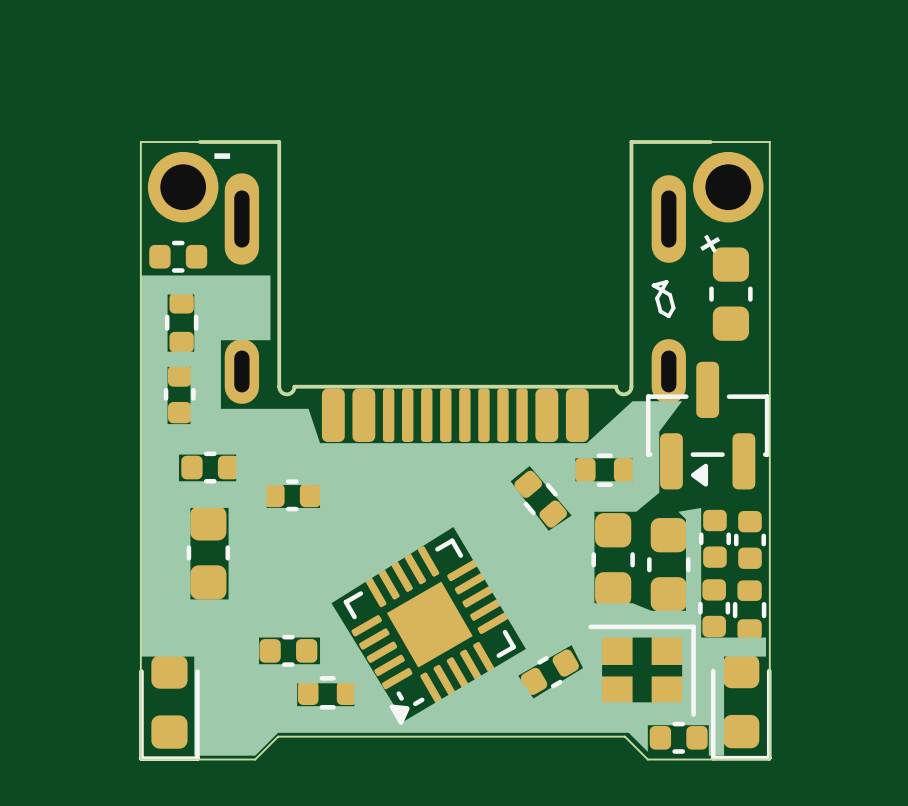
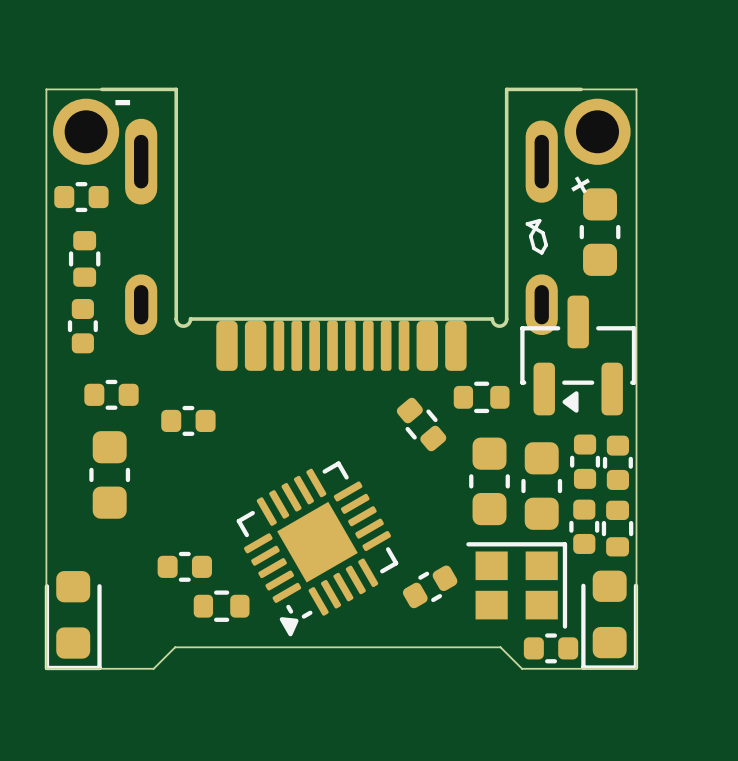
drawing: [140, 275, 767, 756] -> none

